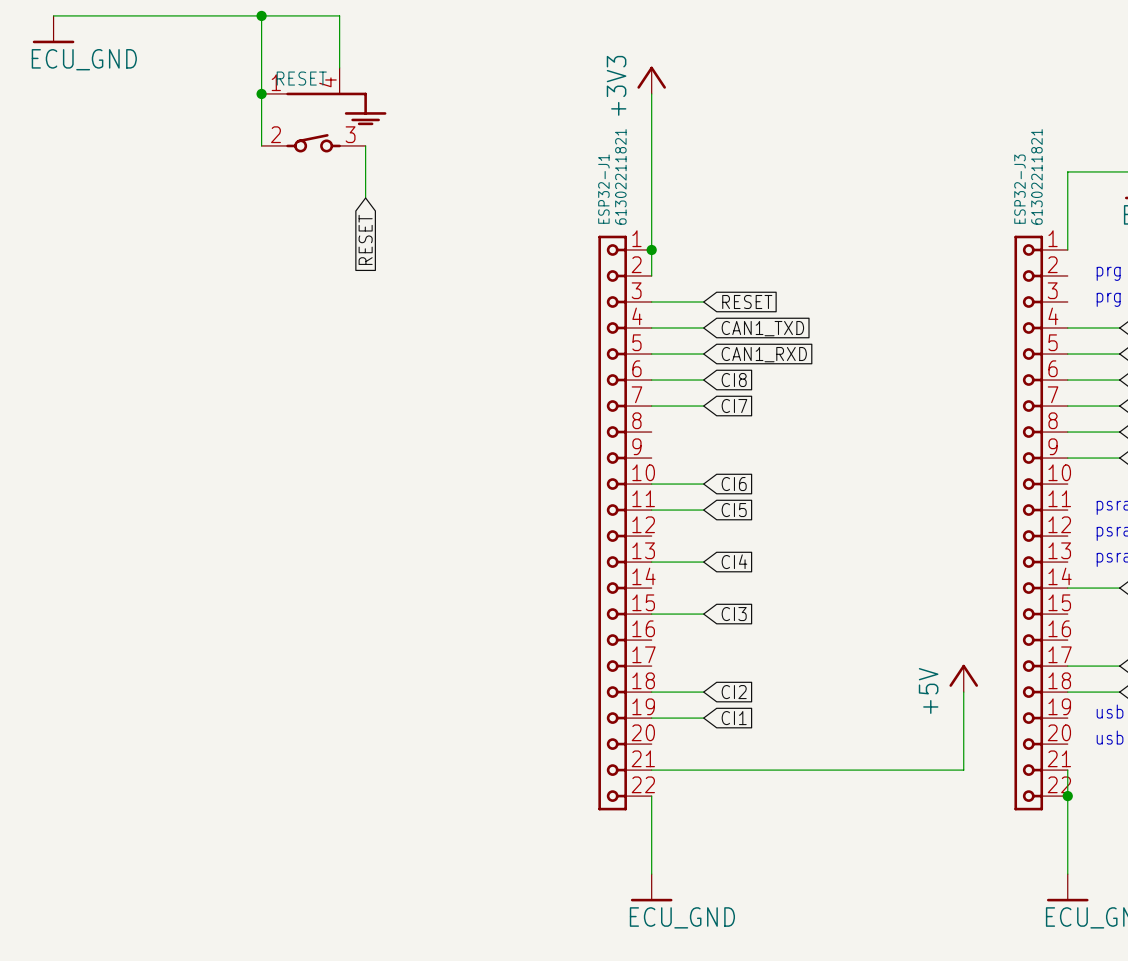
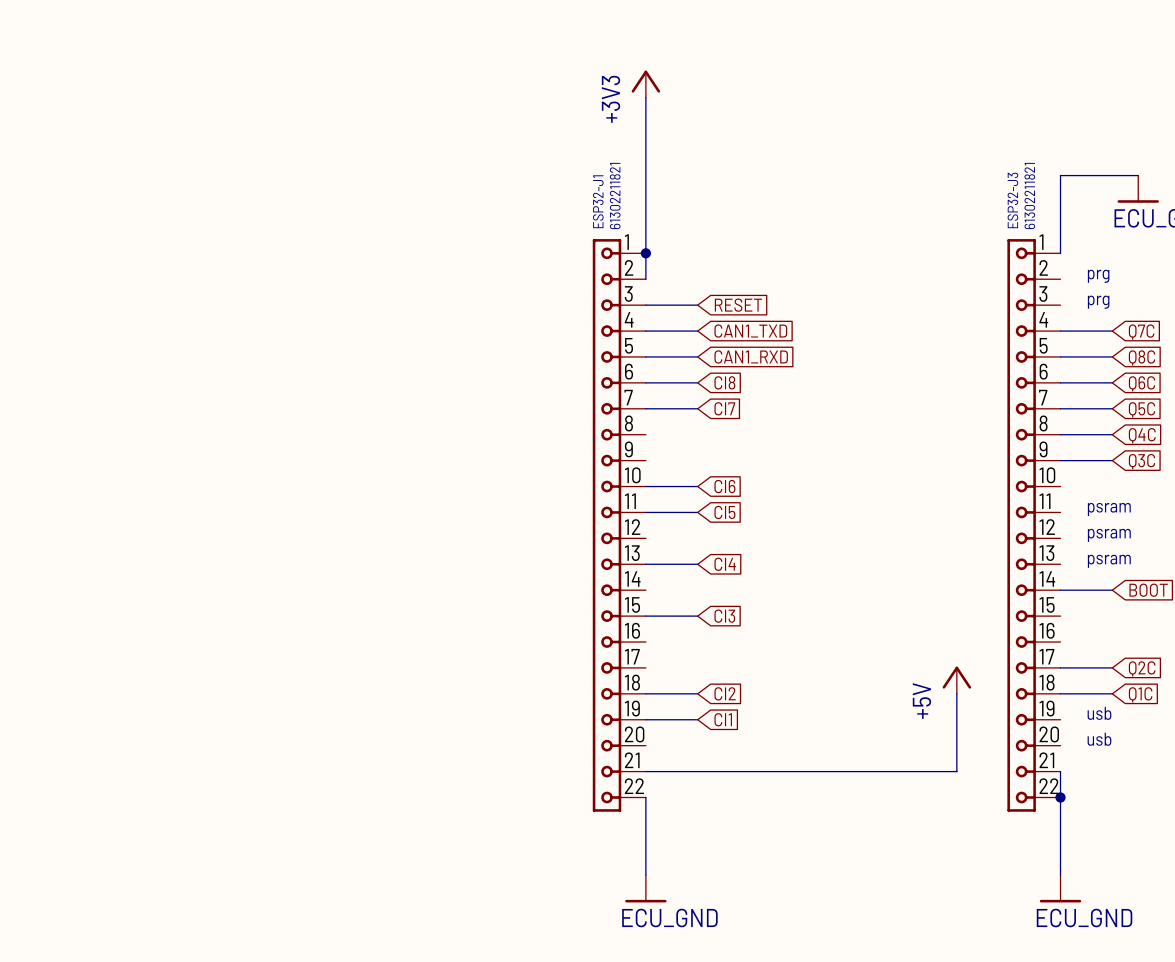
wire: (53, 15) (339, 15) (339, 67) -> none
wire: (261, 15) (261, 145) -> none
junction: (261, 15) -> none
power symbol: ECU_GND (53, 29) -> none
junction: (261, 93) -> none
RESET: (324, 110) -> none
wire: (365, 145) (365, 197) -> none
global label: RESET (365, 239) -> none

